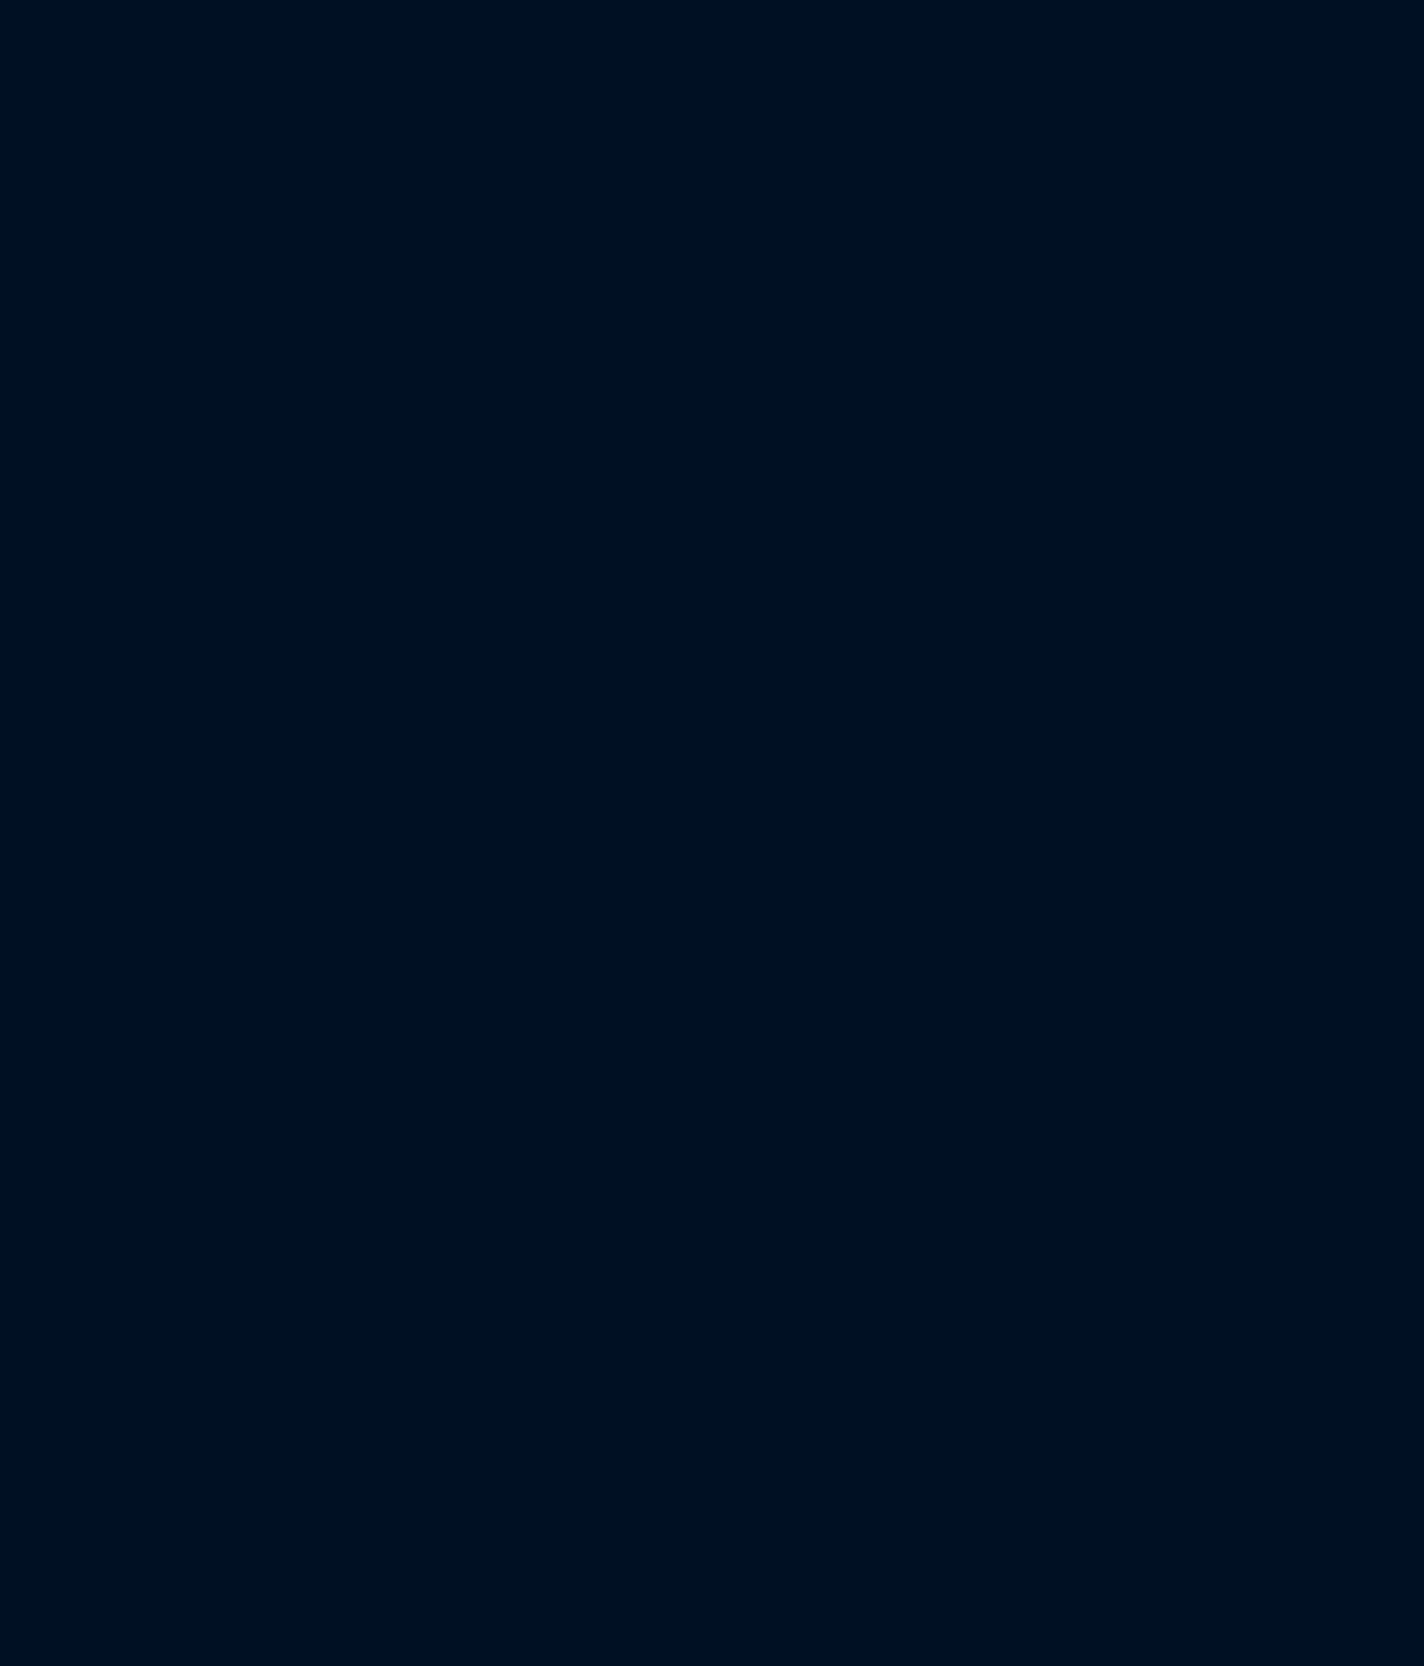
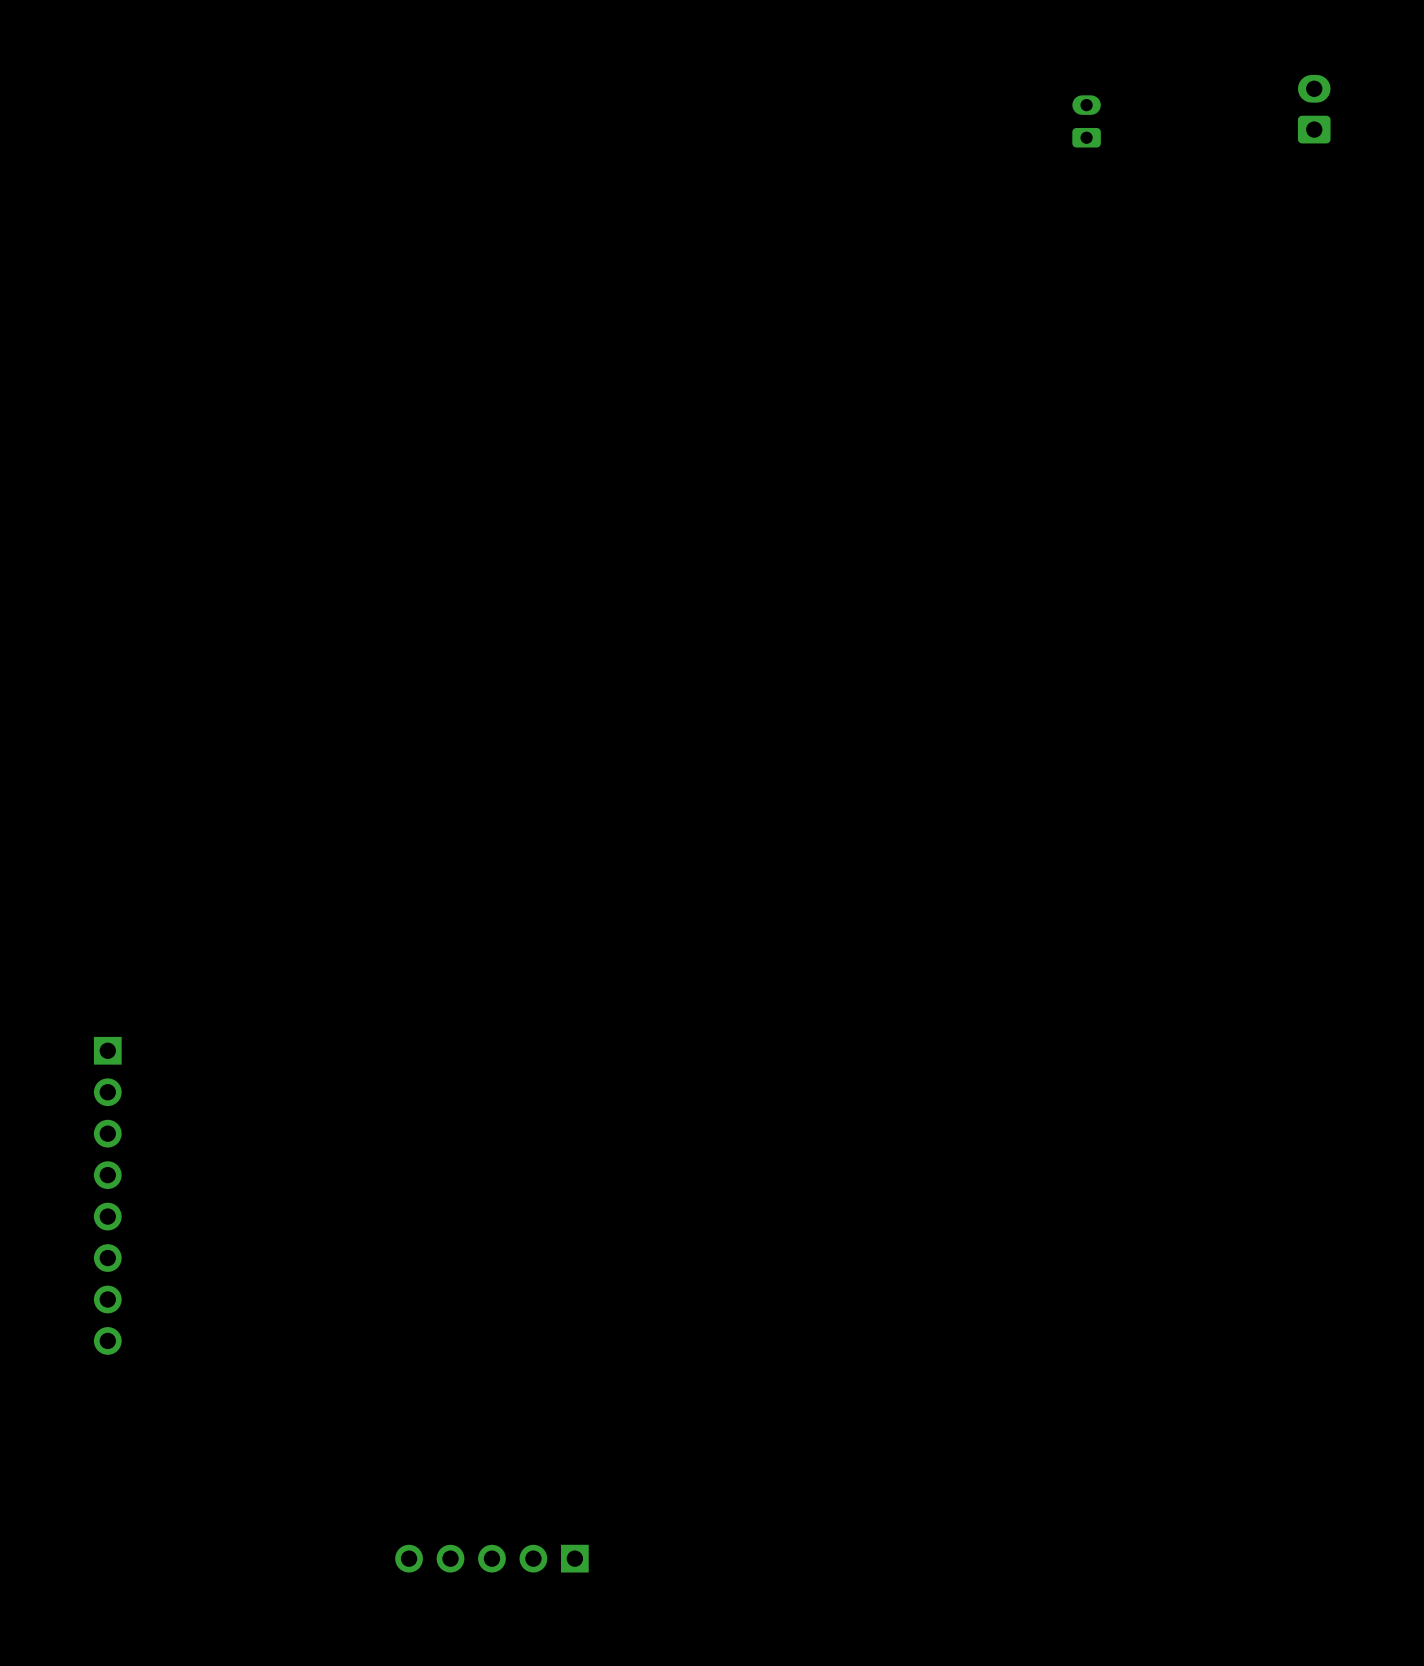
part: none -> (1314, 109)
part: none -> (1086, 121)
part: none -> (107, 1195)
part: none -> (491, 1558)

